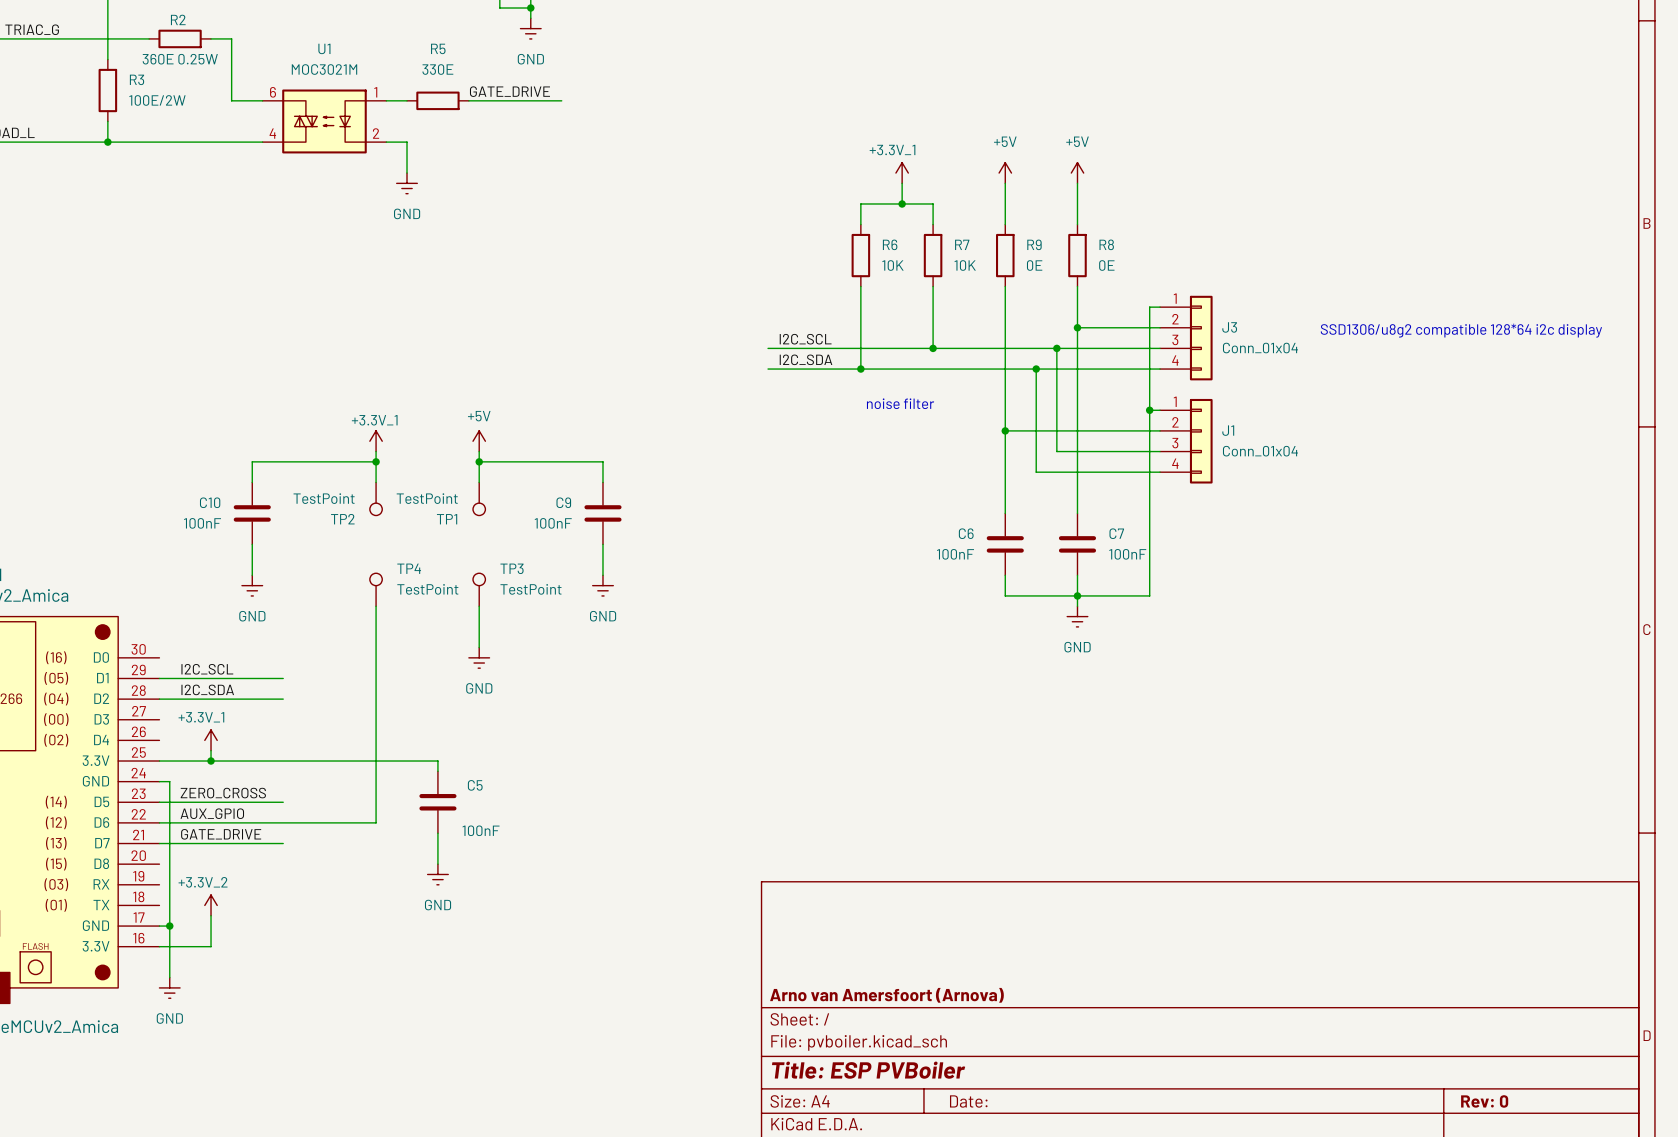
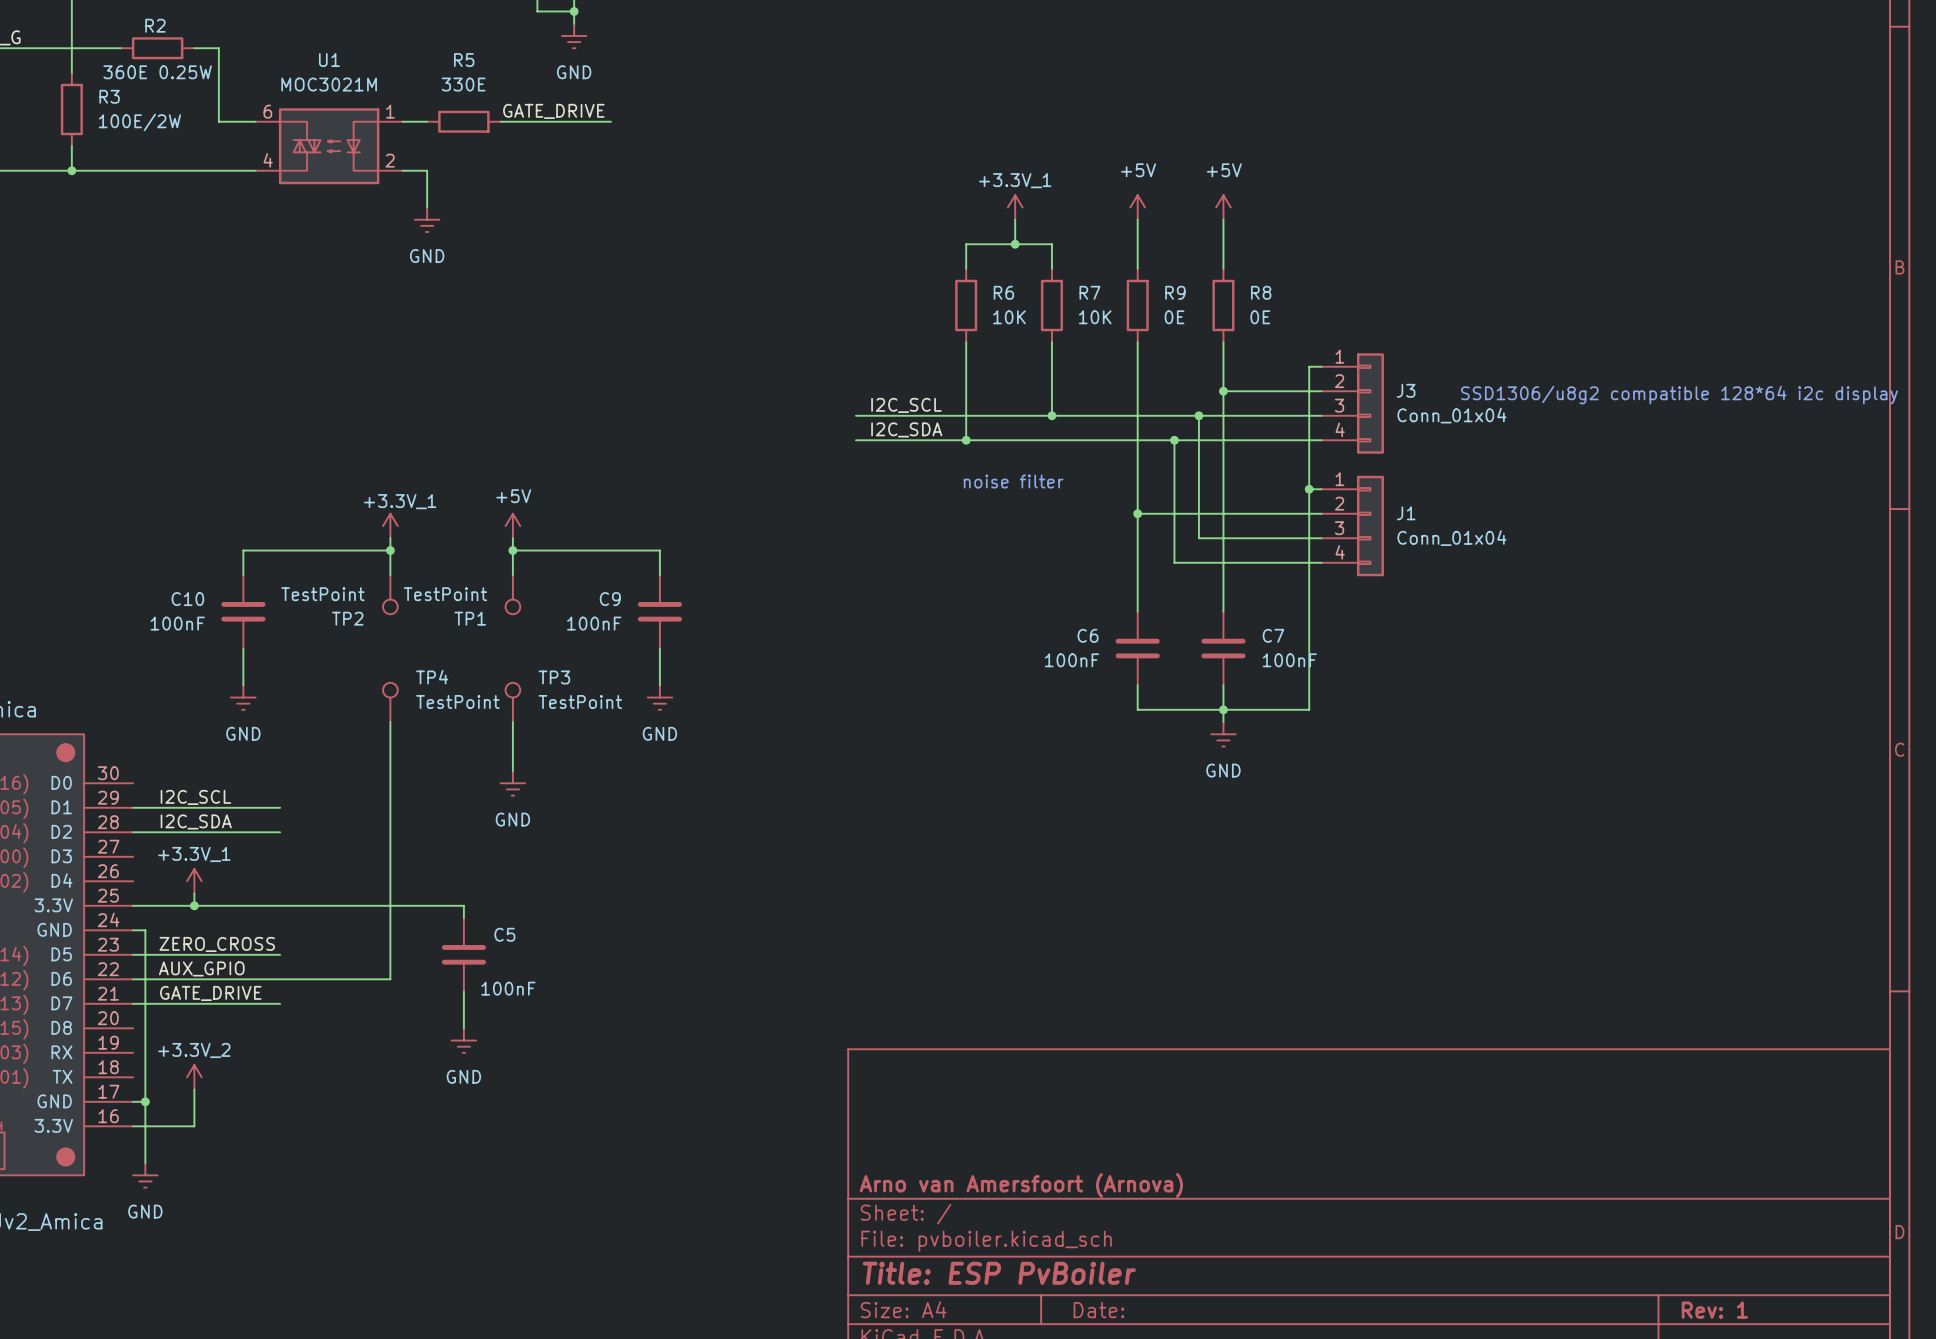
title block: Title: ESP PVBoiler (868, 1070) -> Title: ESP PvBoiler (999, 1273)
title block: Rev: 0 (1484, 1101) -> Rev: 1 (1714, 1310)

